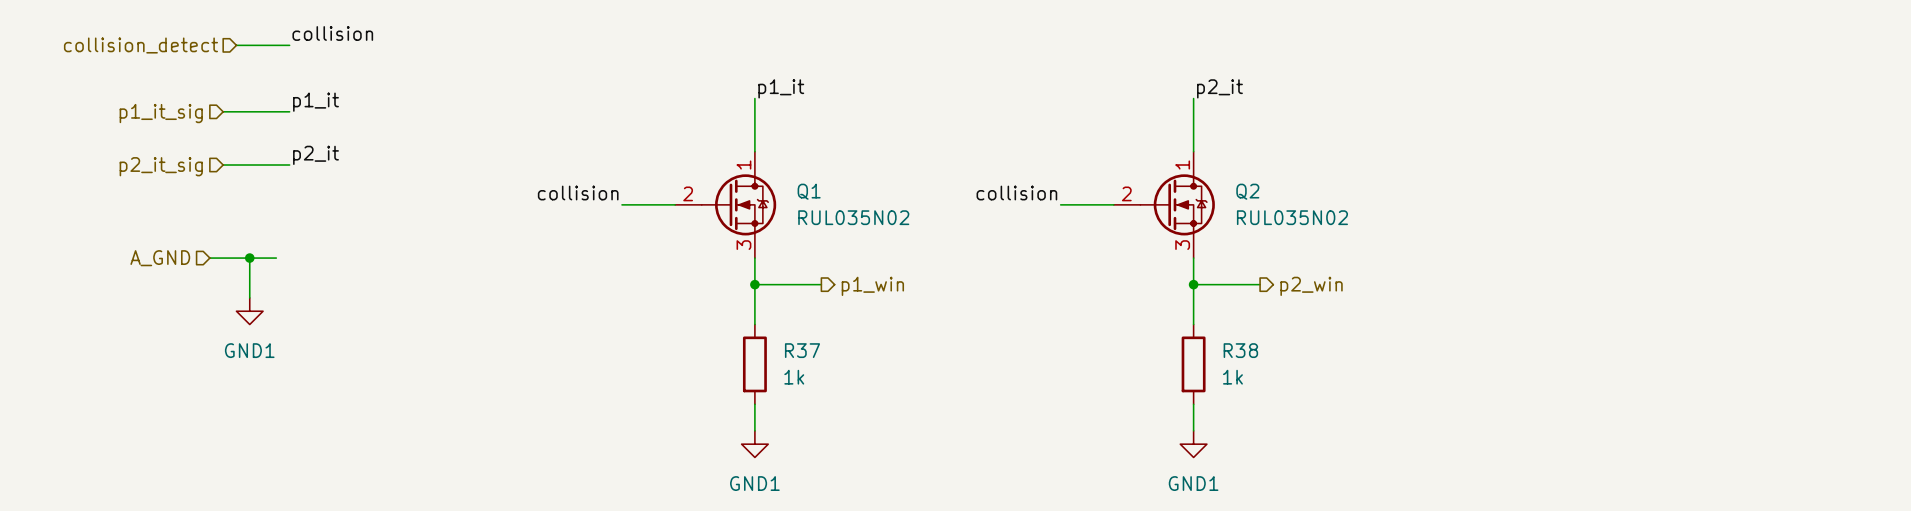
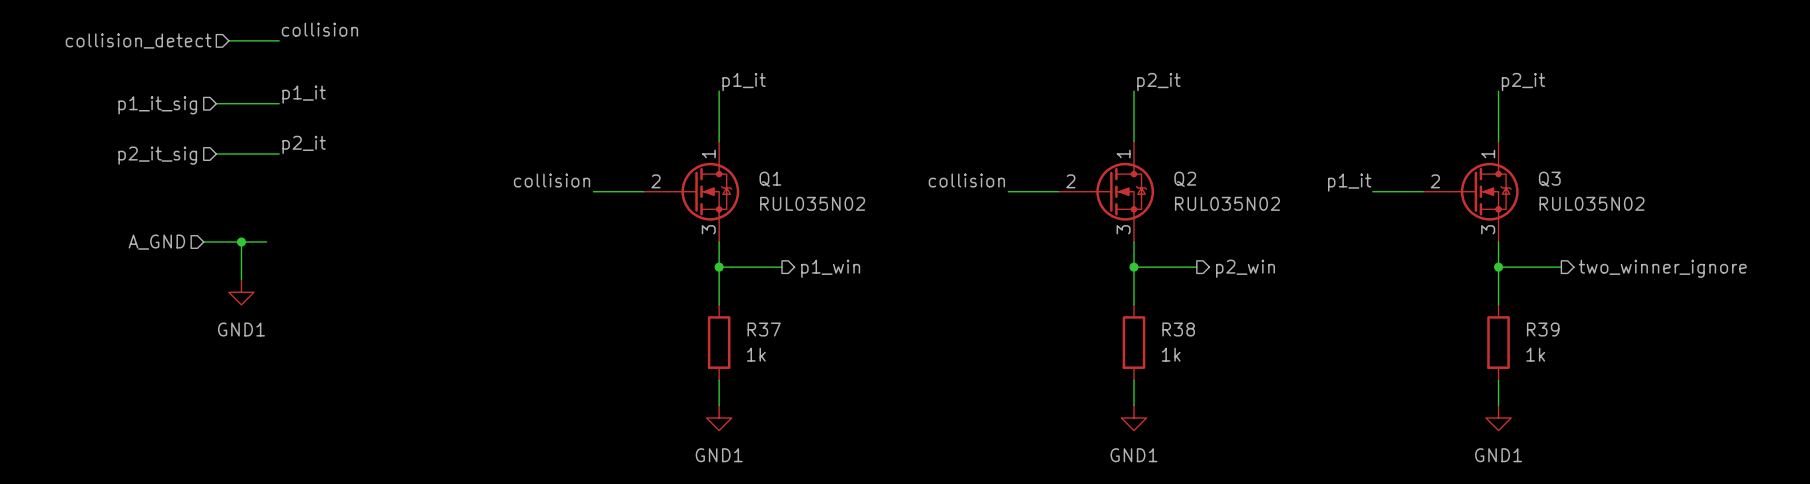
label: none -> p2_it (1523, 82)
wire: none -> (1498, 91) (1498, 141)
label: none -> p1_it (1349, 182)
wire: none -> (1372, 191) (1423, 191)
Q3: none -> RUL035N02 (1470, 191)
wire: none -> (1498, 242) (1498, 304)
wire: none -> (1498, 267) (1561, 267)
junction: none -> (1498, 267)
hierarchical label: none -> two_winner_ignore (1662, 268)
R39: none -> 1k (1498, 342)
wire: none -> (1498, 380) (1498, 405)
power symbol: none -> GND1 (1498, 417)

